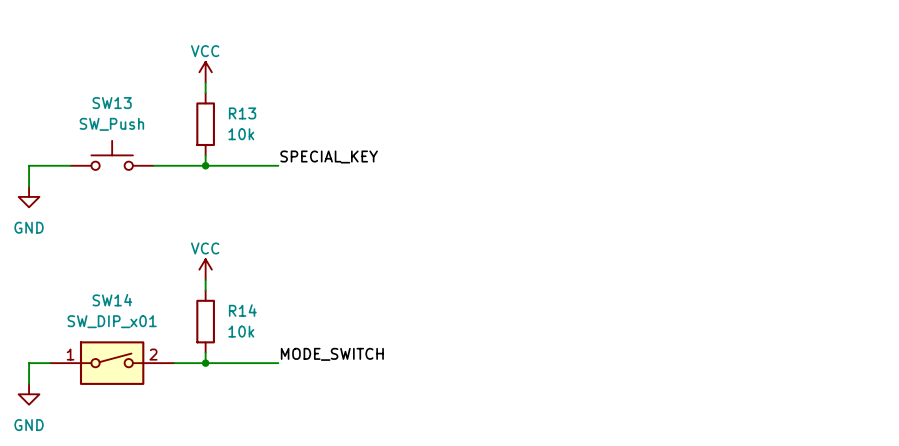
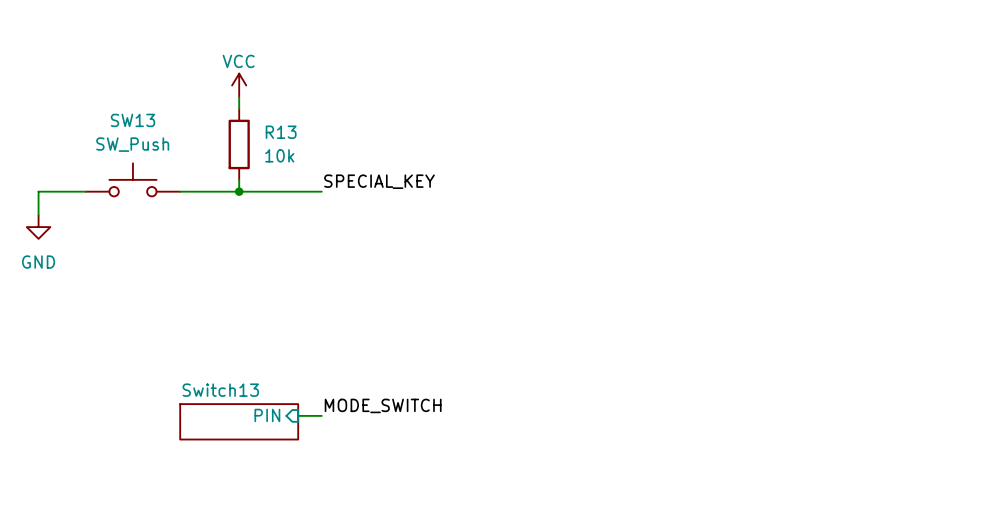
power symbol: VCC (205, 269) -> none
wire: (205, 280) (205, 290) -> none
R14: 10k (205, 321) -> none
wire: (205, 352) (205, 363) -> none
sheet pin: none -> PIN (267, 415)
wire: (49, 363) (29, 363) (29, 383) -> none
SW14: SW_DIP_x01 (112, 363) -> none
wire: (174, 363) (257, 363) -> none
junction: (205, 363) -> none
sheet Switch13: none -> (239, 421)
power symbol: GND (29, 394) -> none

